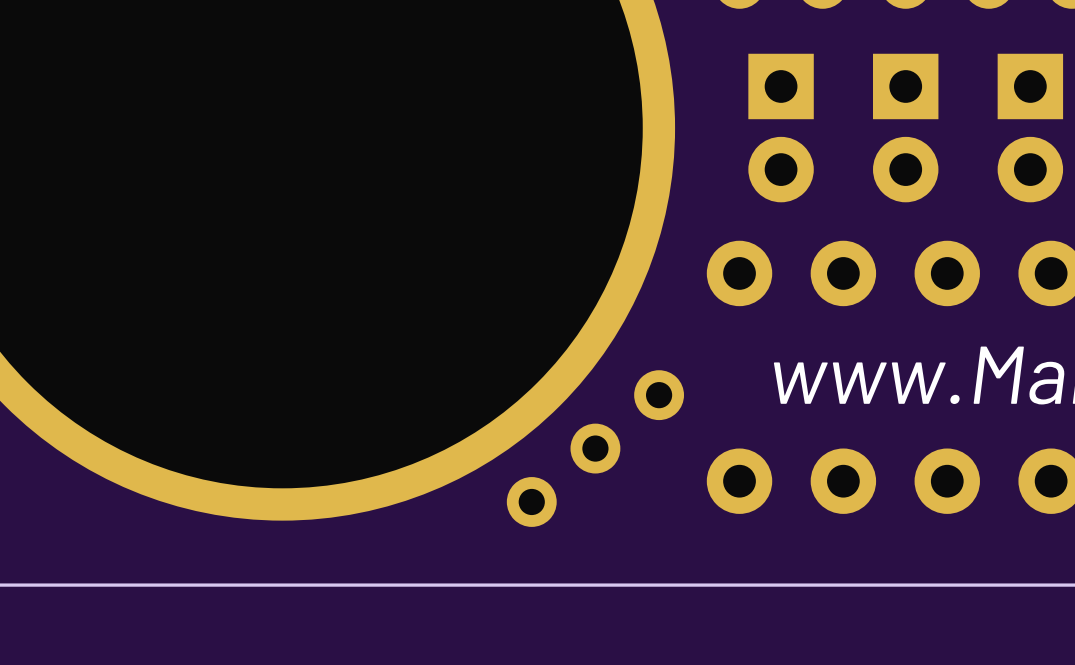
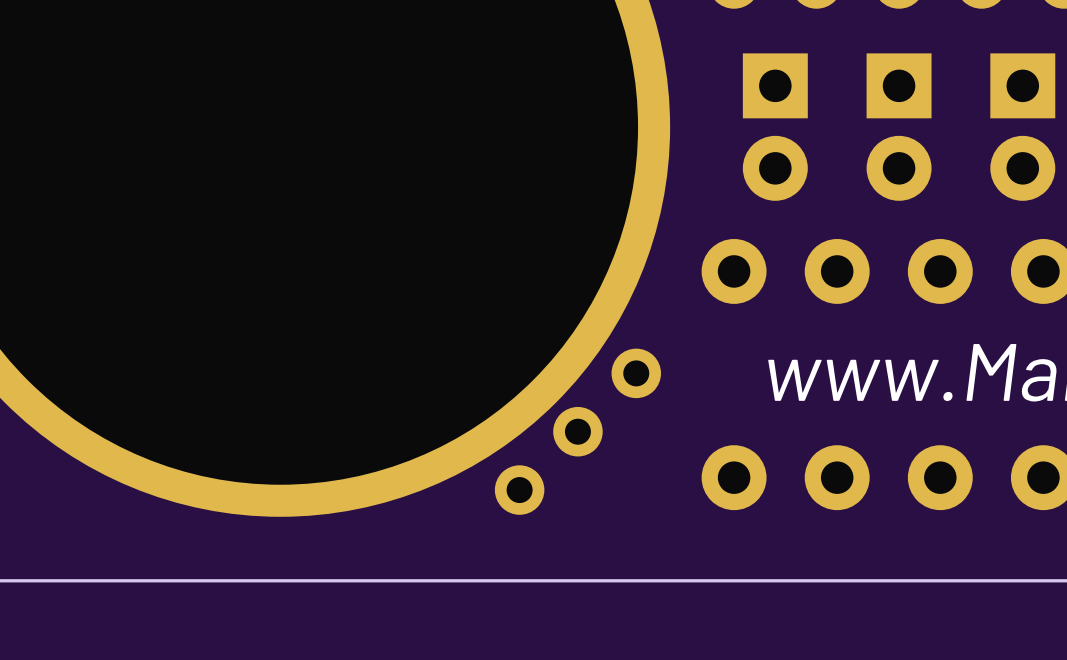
part rotation: 0° (595, 448) -> 5° counterclockwise (577, 431)

